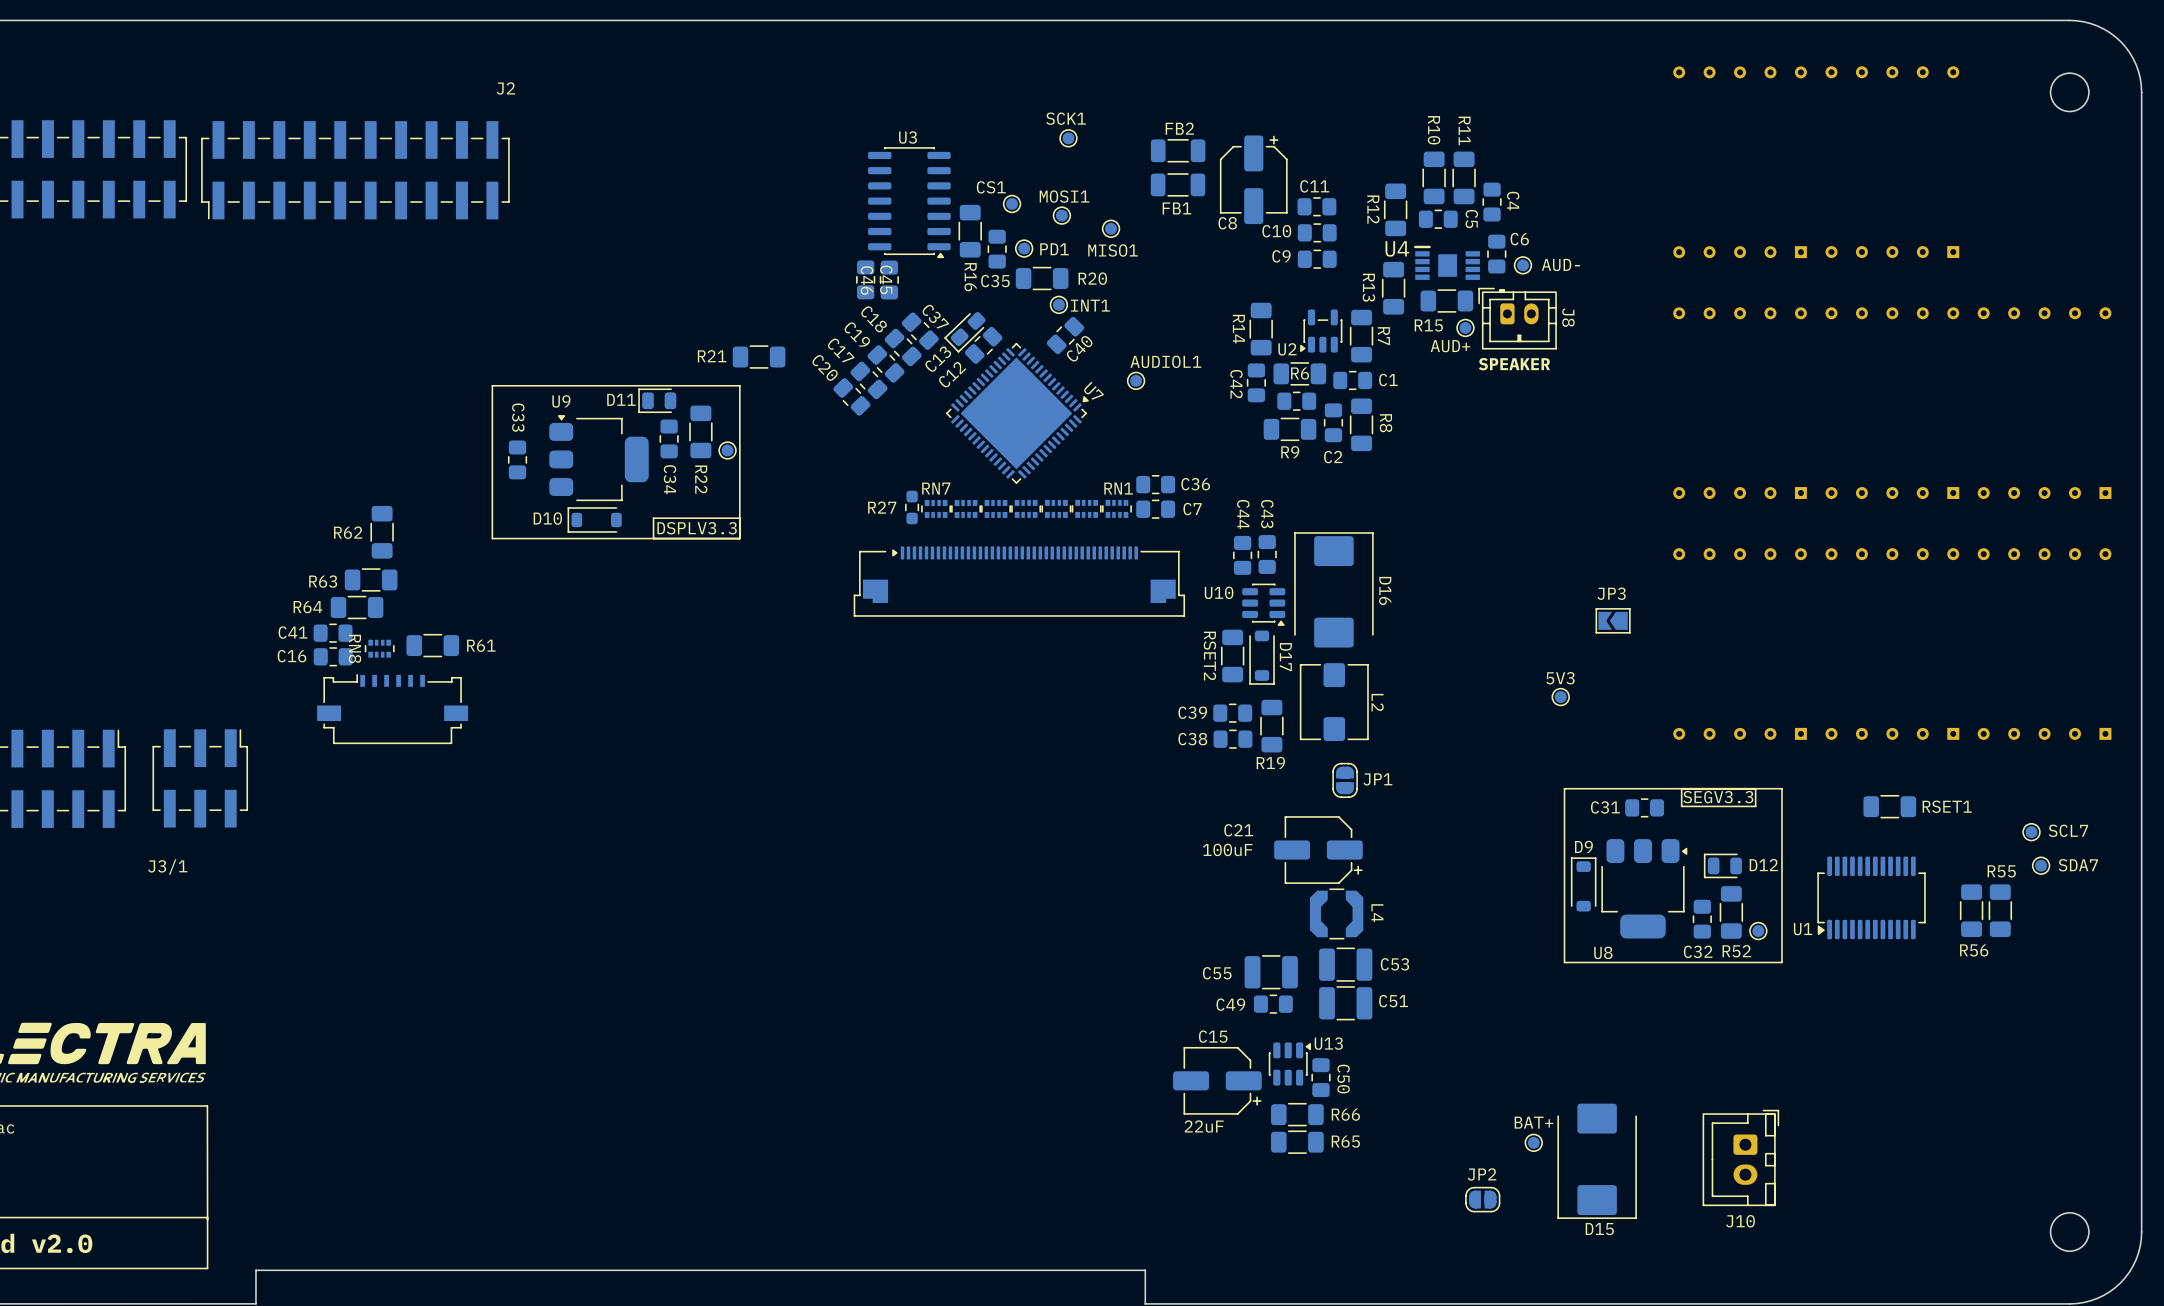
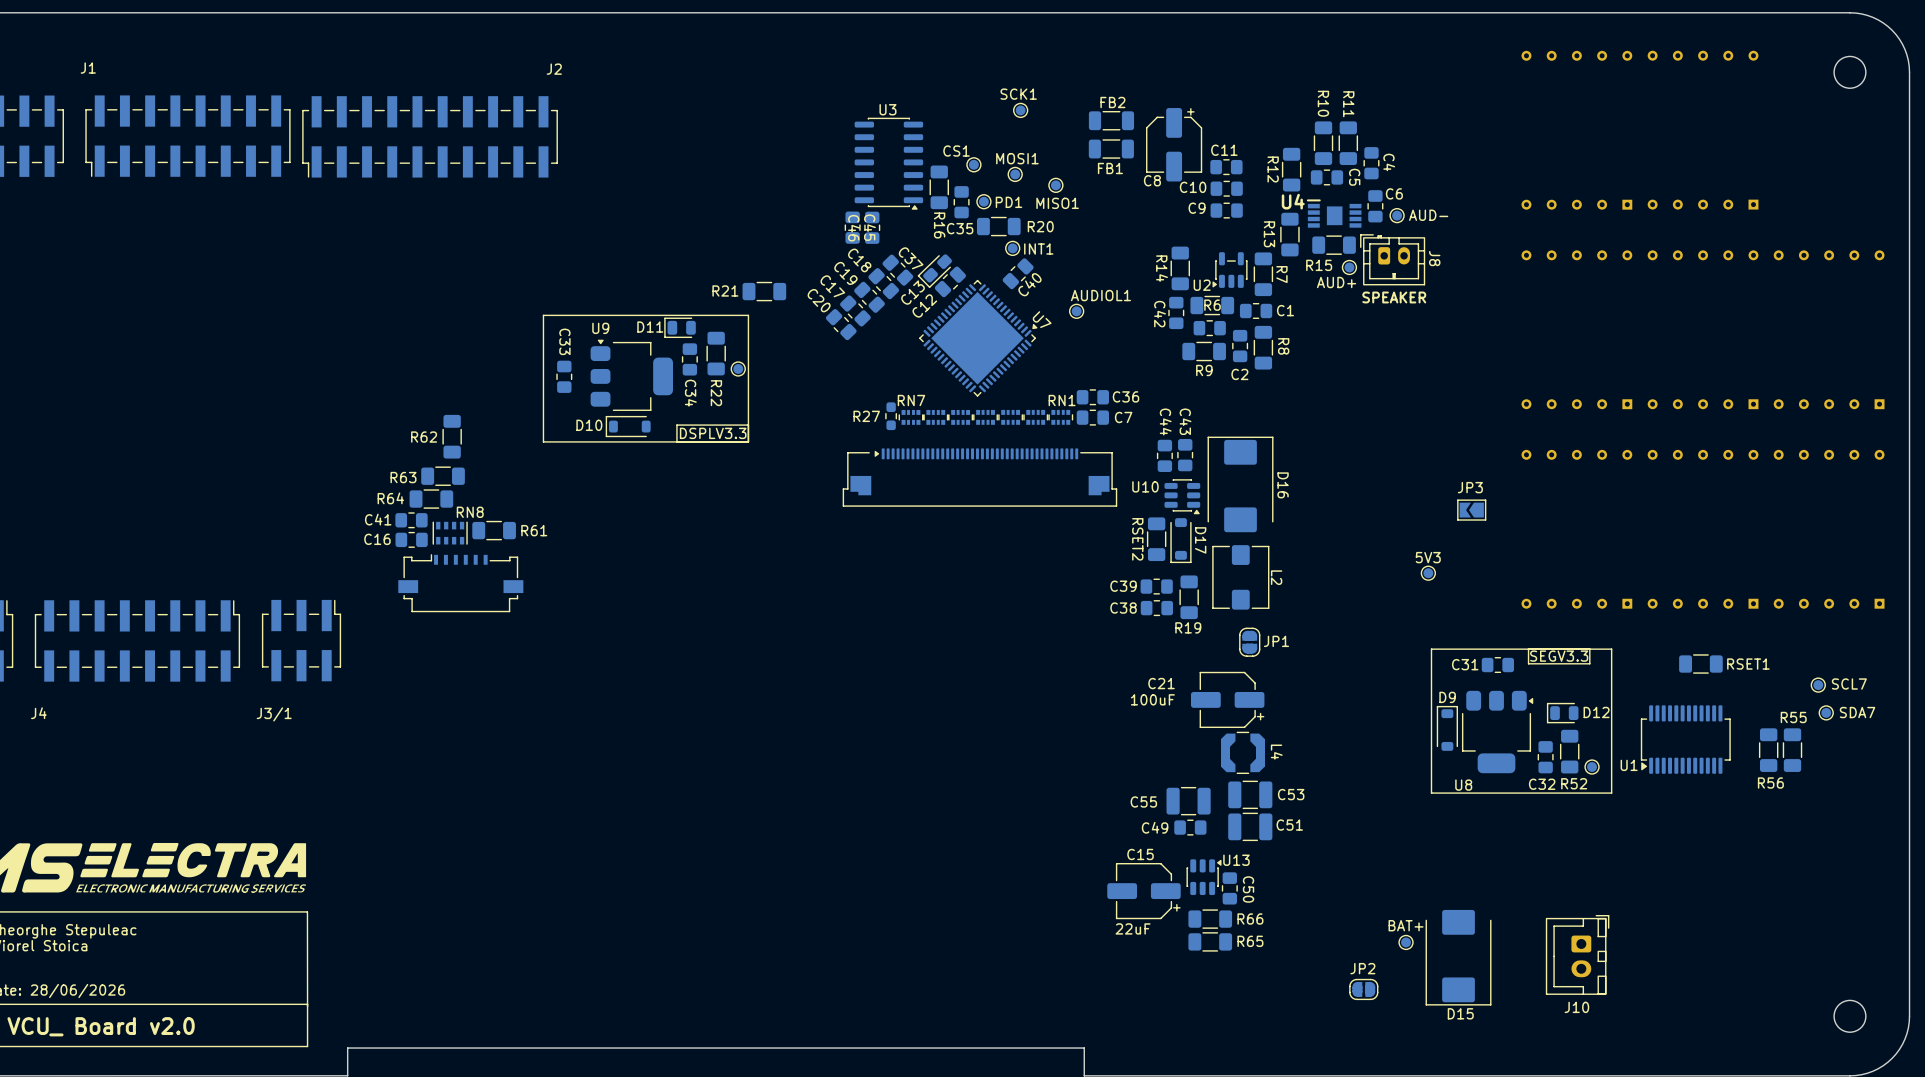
RN8 footprint: [364, 639, 395, 658] -> [432, 521, 468, 545]
RN8 name rotation: 0° (355, 649) -> 90° counterclockwise (470, 512)
RN8 name position: RN8 (355, 649) -> RN8 (470, 512)

